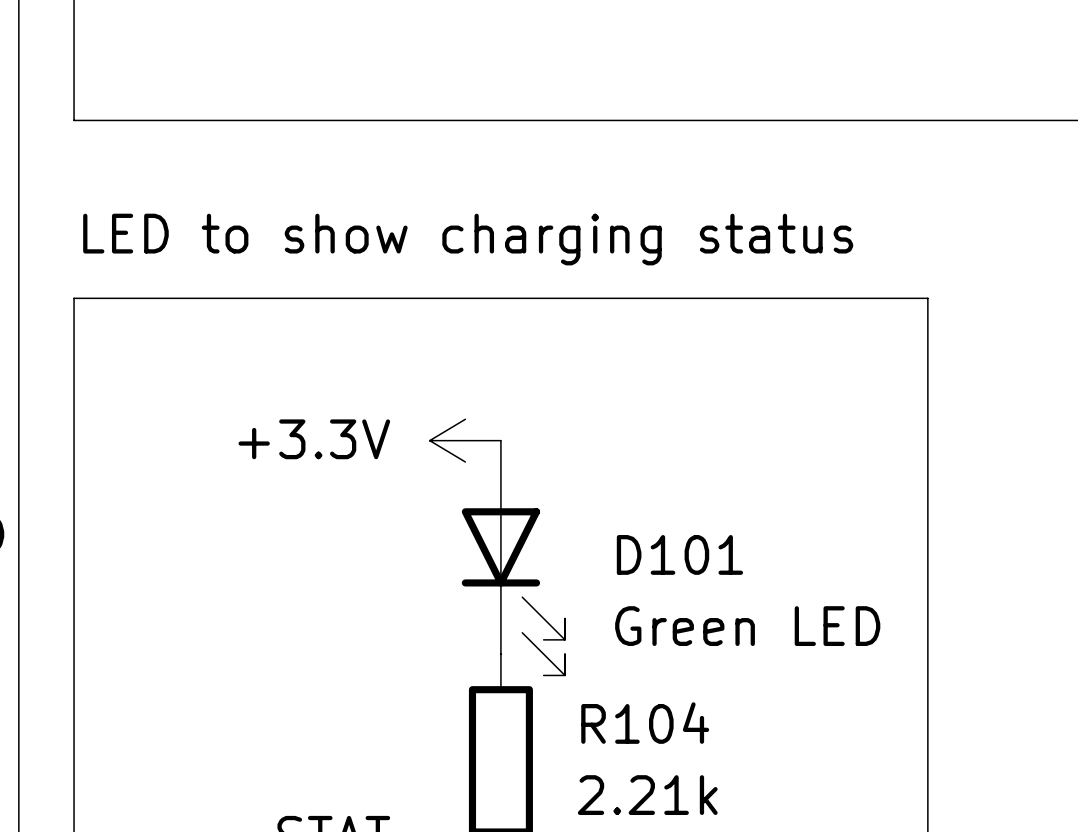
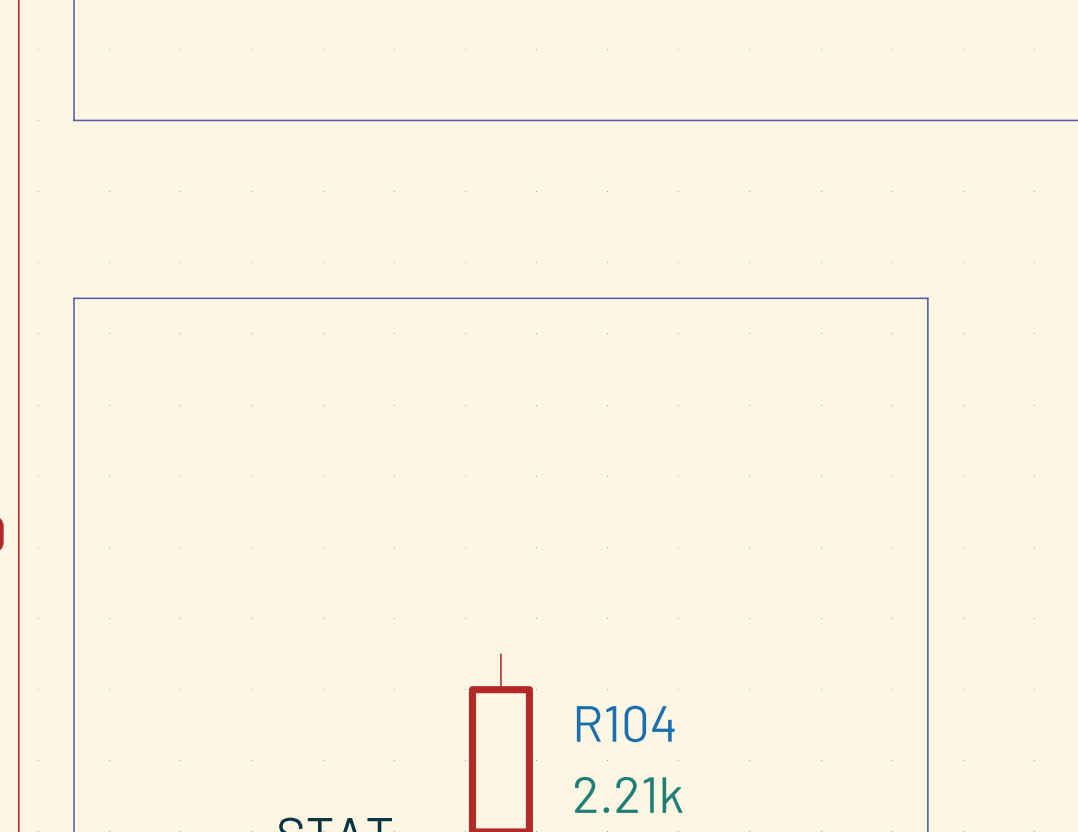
text: LED to show charging status (468, 239) -> none
power symbol: +3.3V (465, 440) -> none
D101: Green LED (513, 558) -> none

